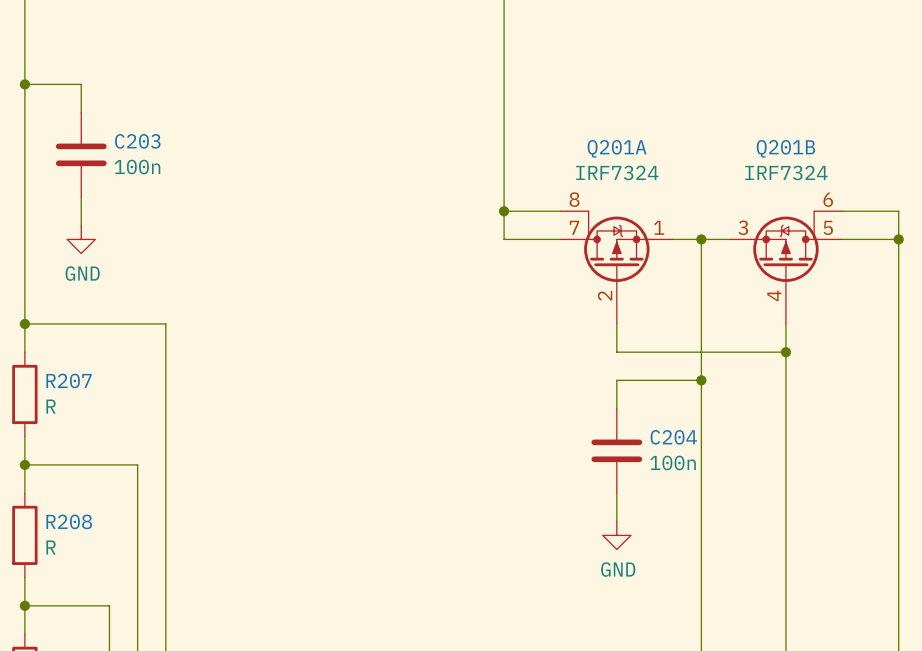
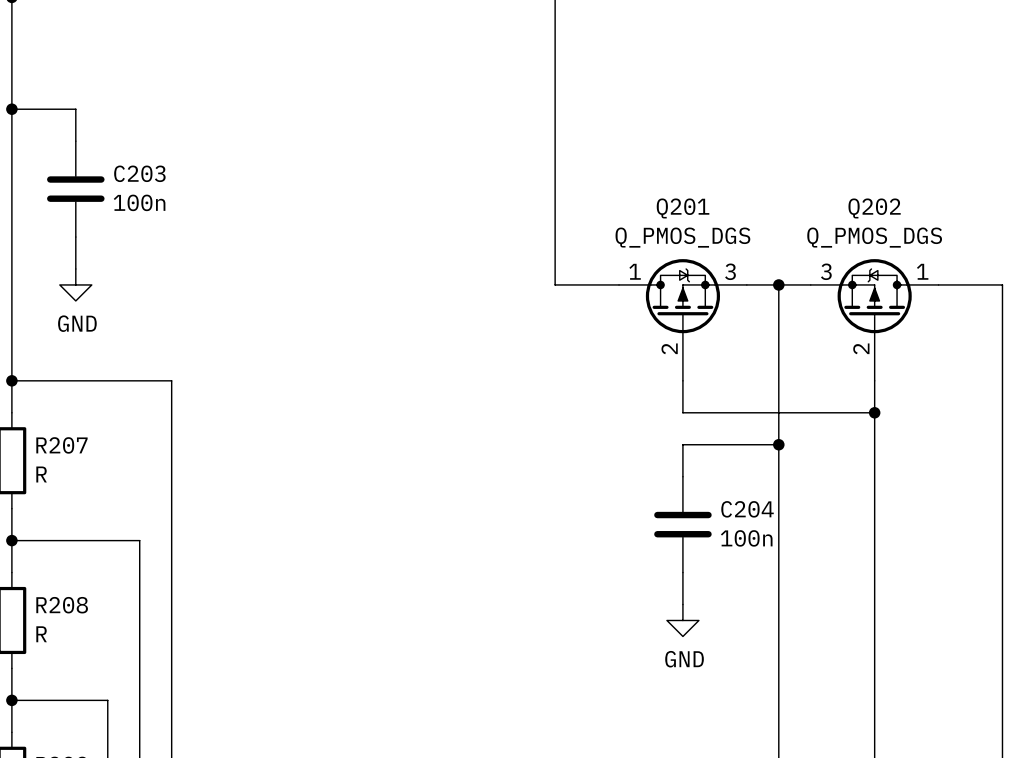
wire: (504, 211) (560, 211) -> none
junction: (504, 211) -> none
wire: (842, 211) (898, 211) (898, 239) -> none
junction: (898, 239) -> none
Q201A: IRF7324 (616, 267) -> none
Q201B: IRF7324 (785, 267) -> none
Q201: none -> Q_PMOS_DGS (682, 319)
Q202: none -> Q_PMOS_DGS (874, 319)

